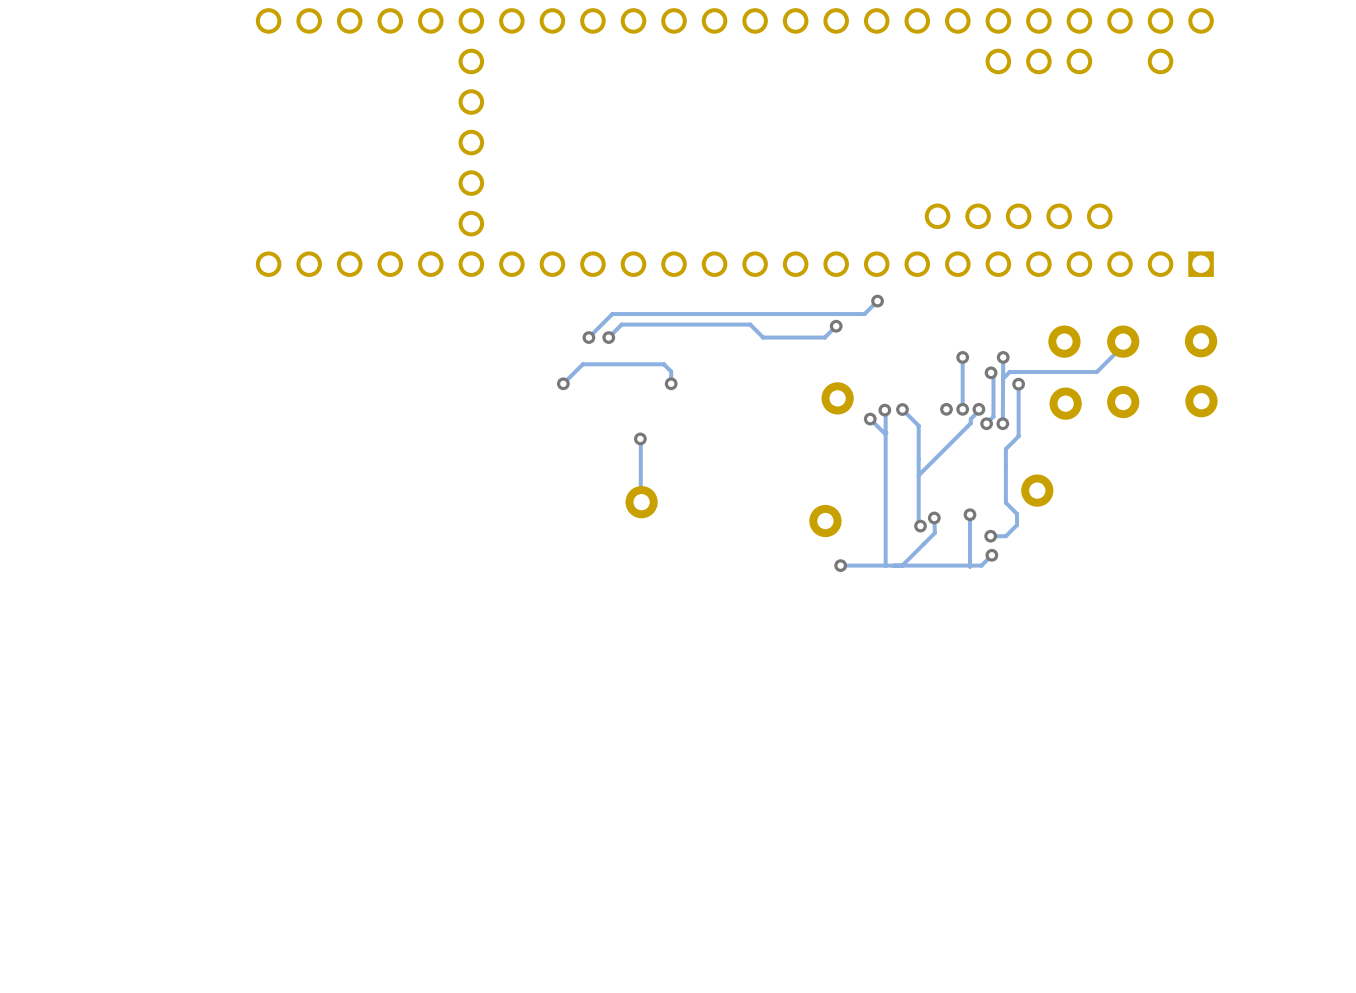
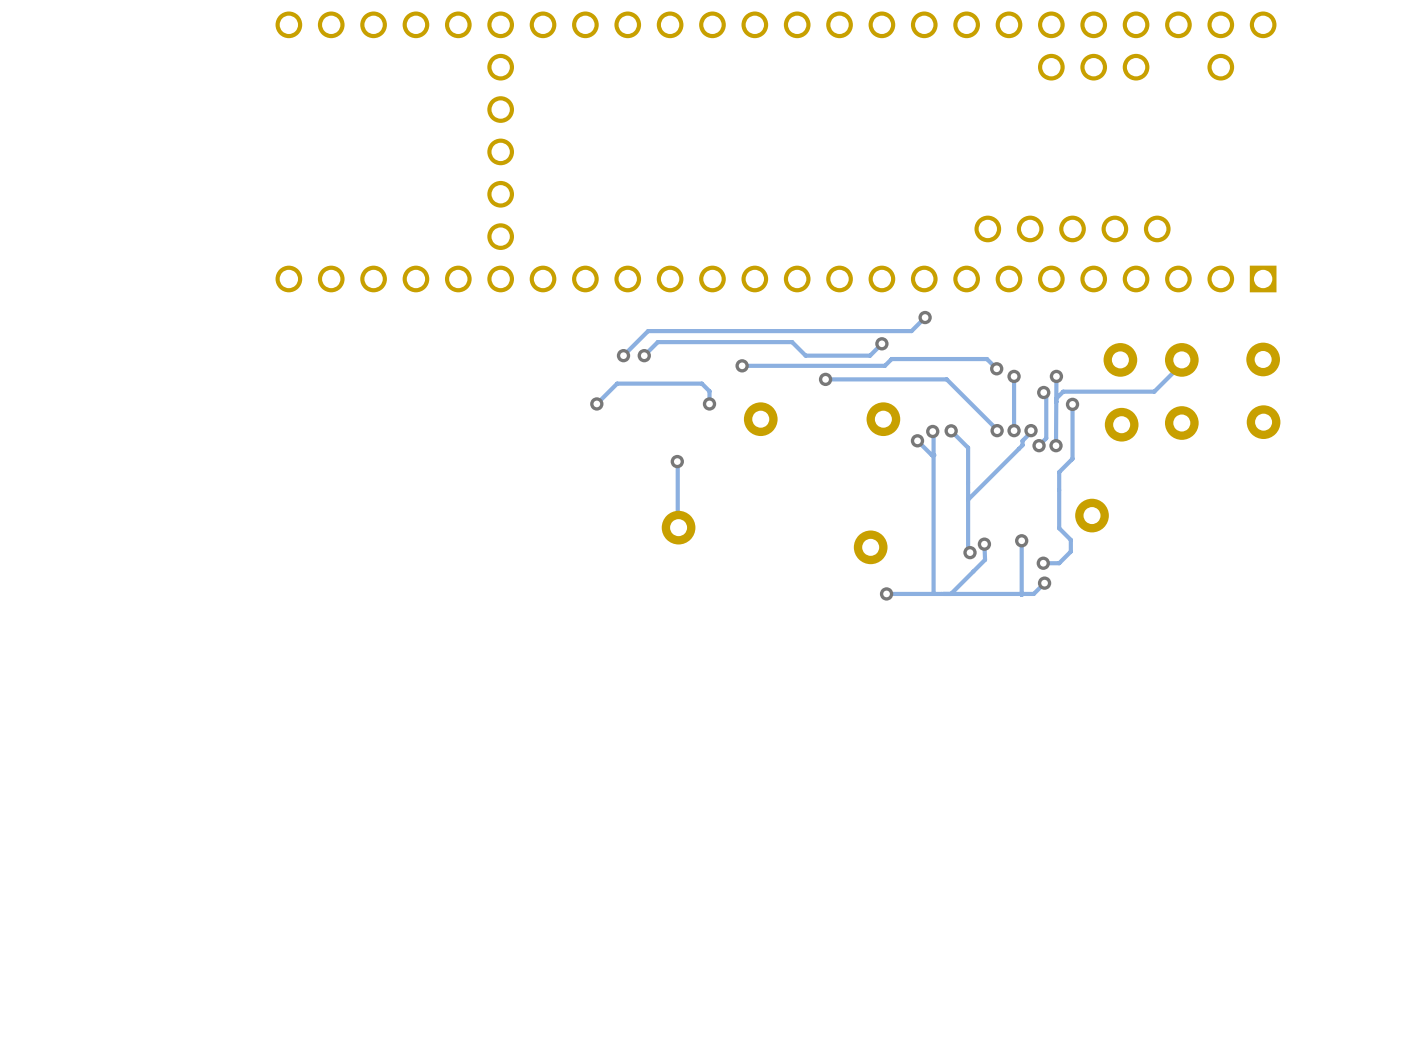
track: none -> (742, 365) (884, 365) (891, 359) (986, 359) (996, 368)
via: none -> (742, 365)
via: none -> (996, 368)
track: none -> (825, 379) (946, 379) (997, 430)
via: none -> (825, 379)
part: none -> (760, 419)

